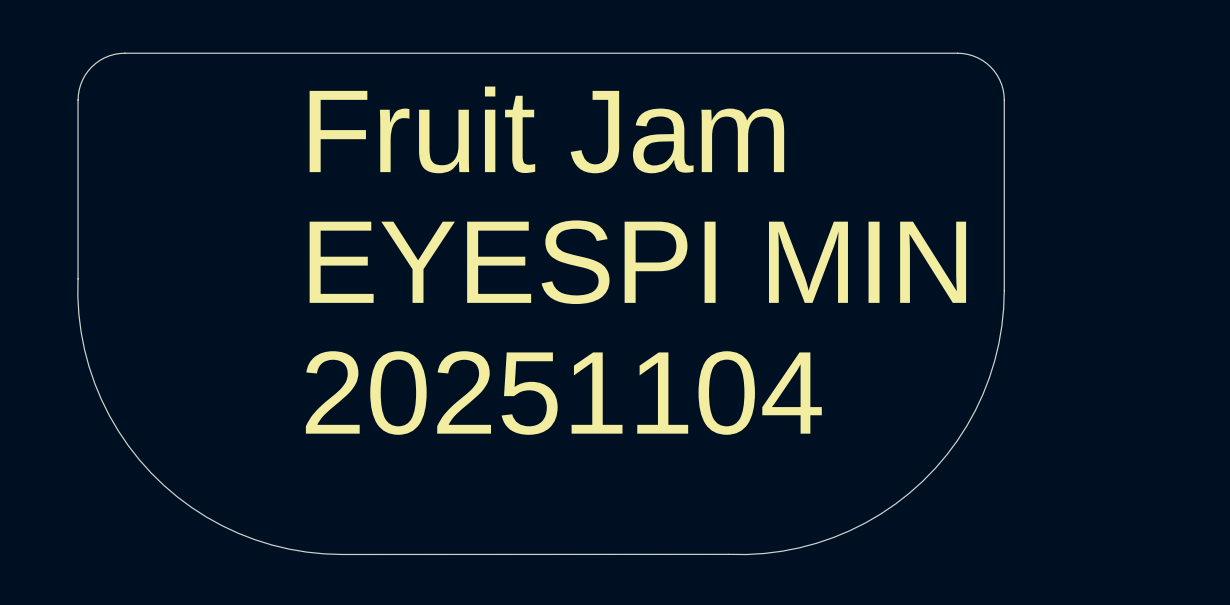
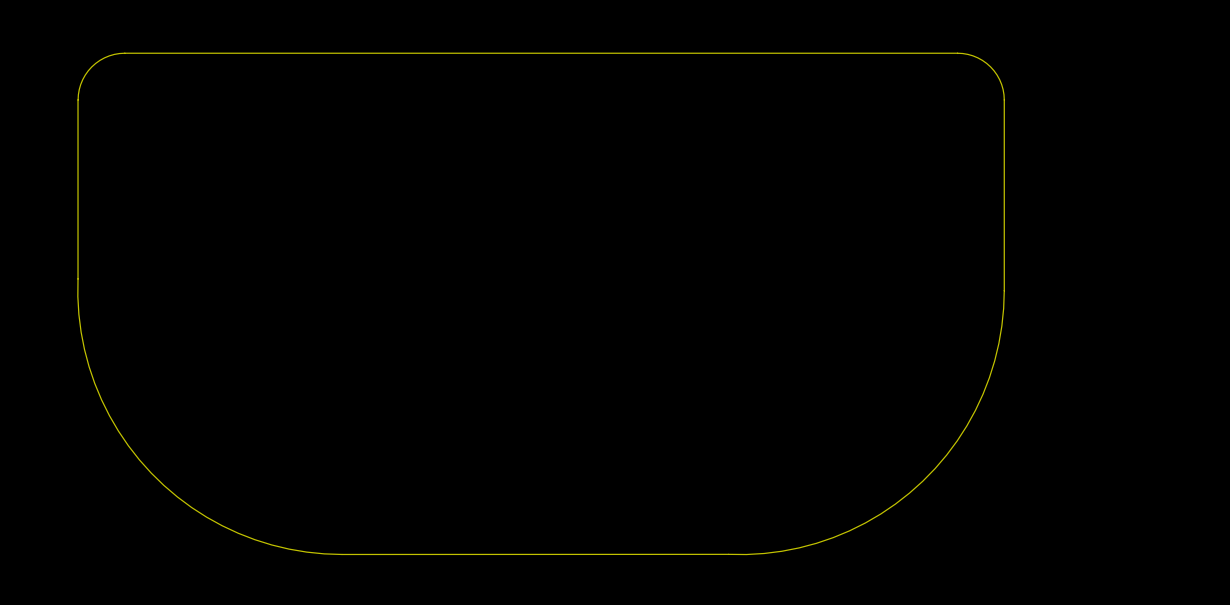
text: Fruit Jam (546, 129) -> none
text: EYESPI MIN (637, 262) -> none
text: 20251104 (563, 393) -> none

